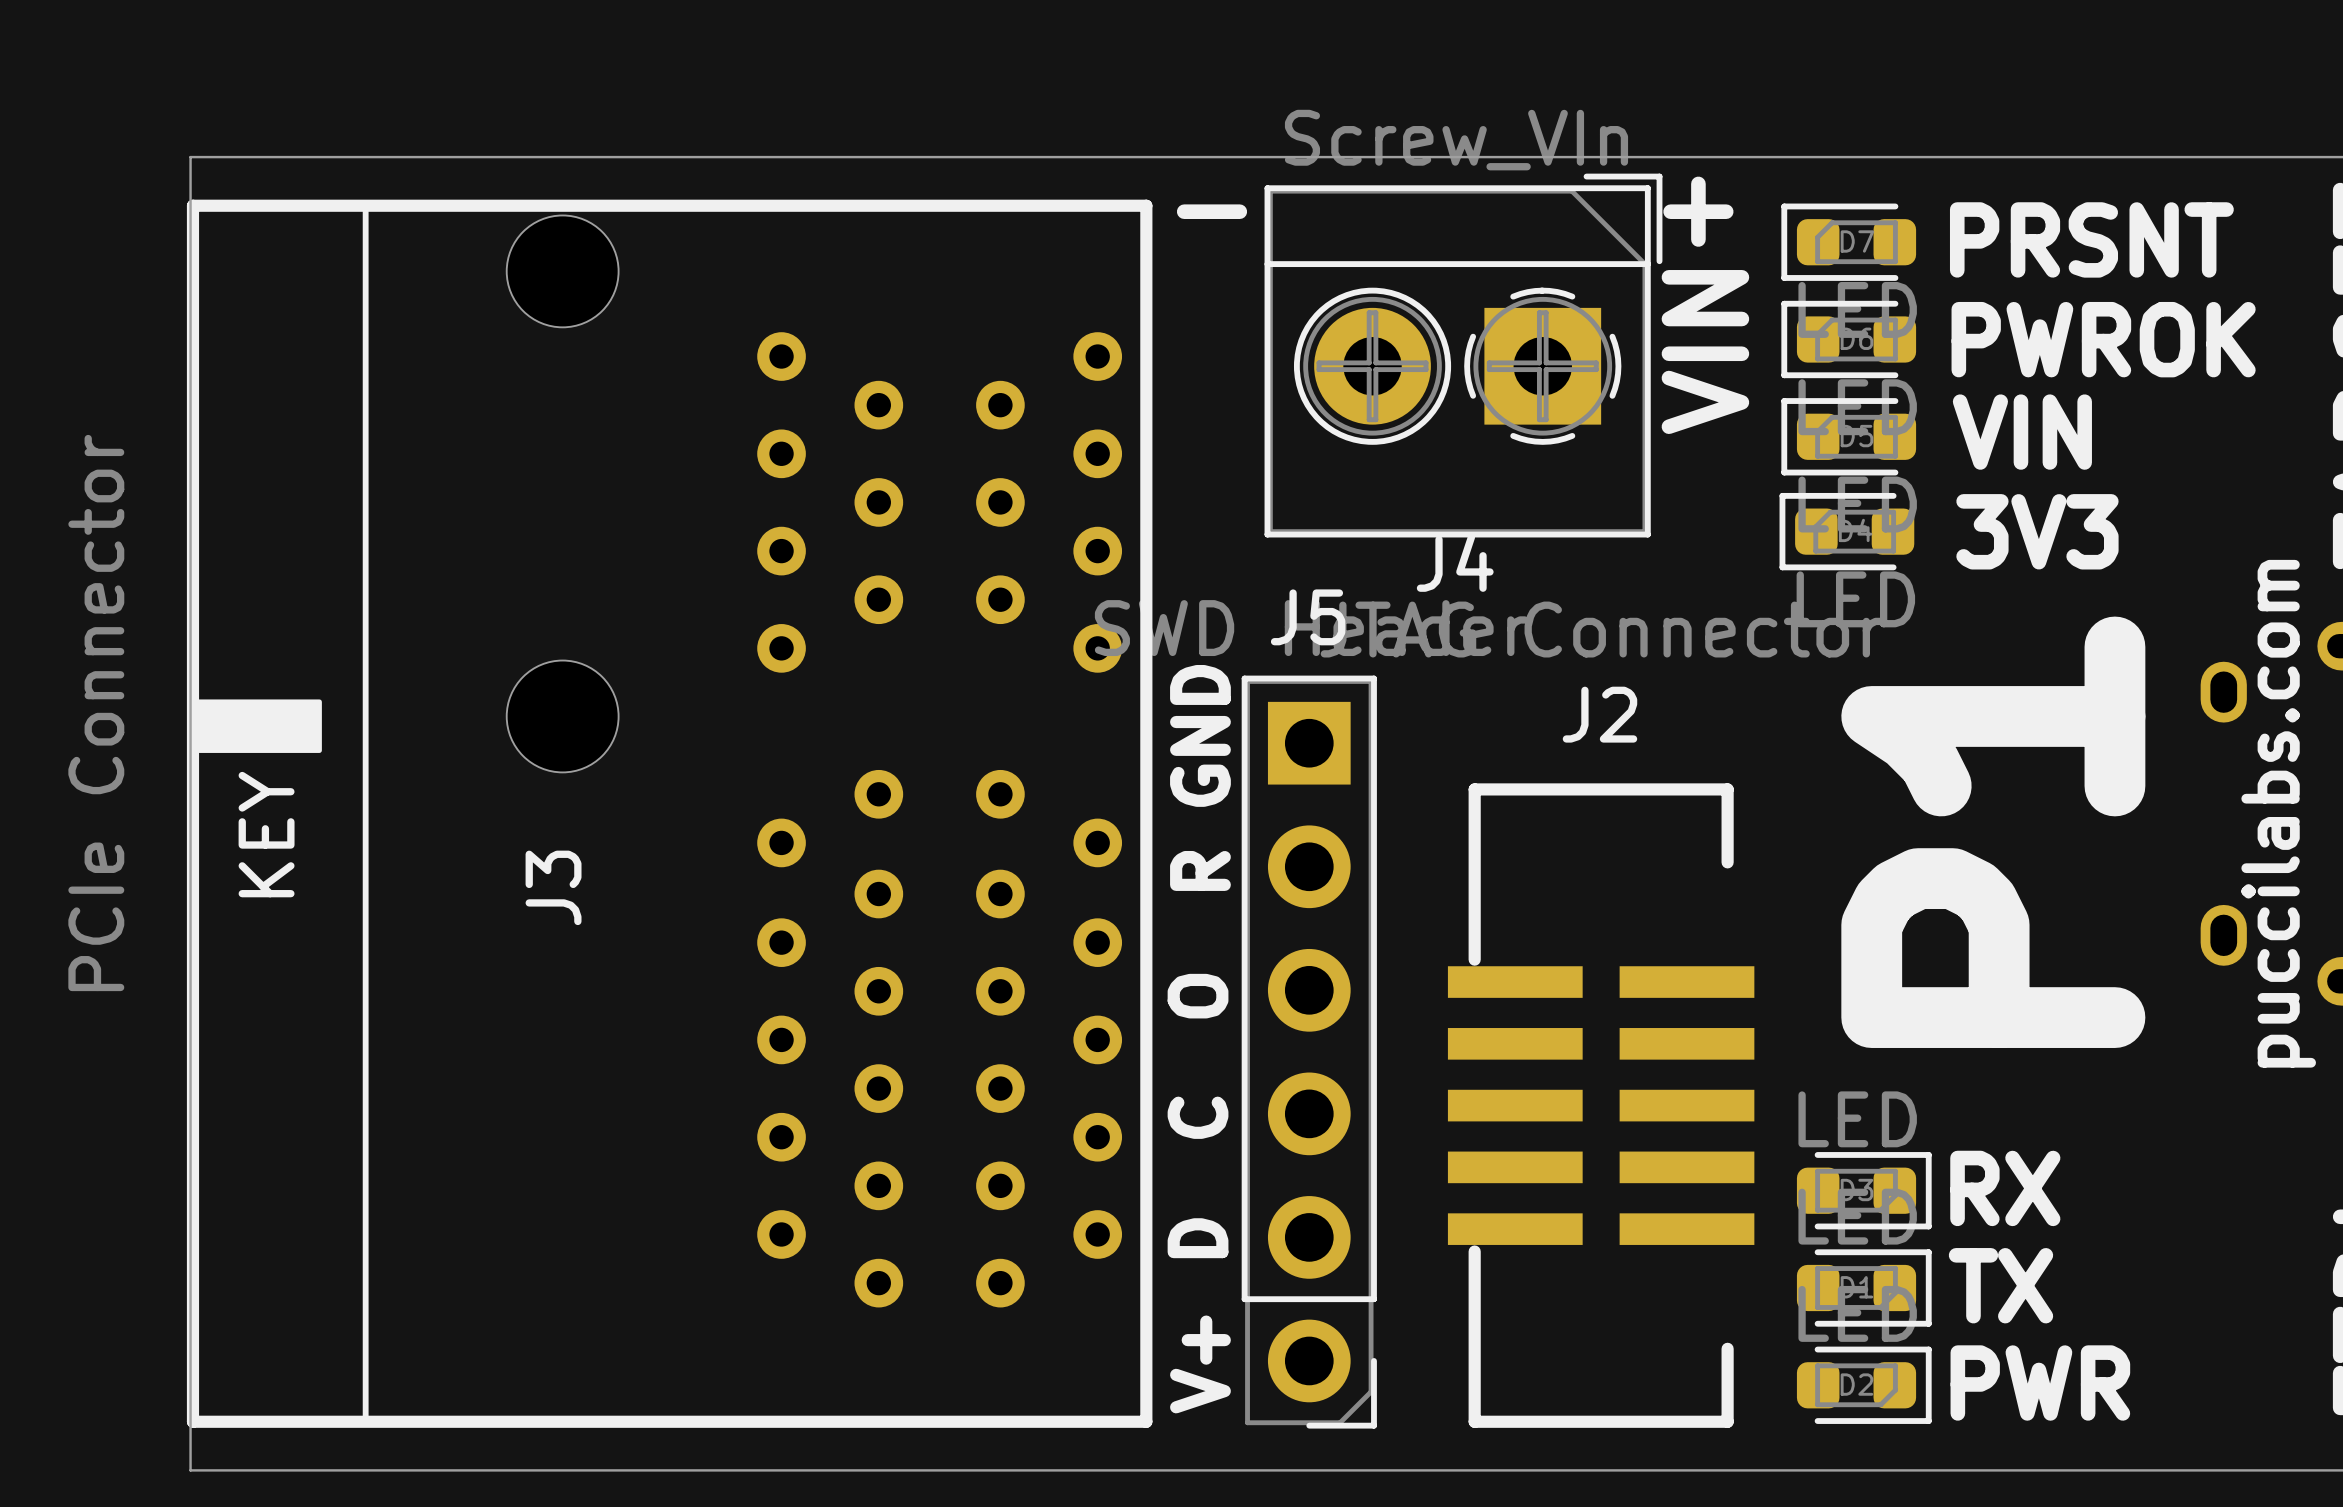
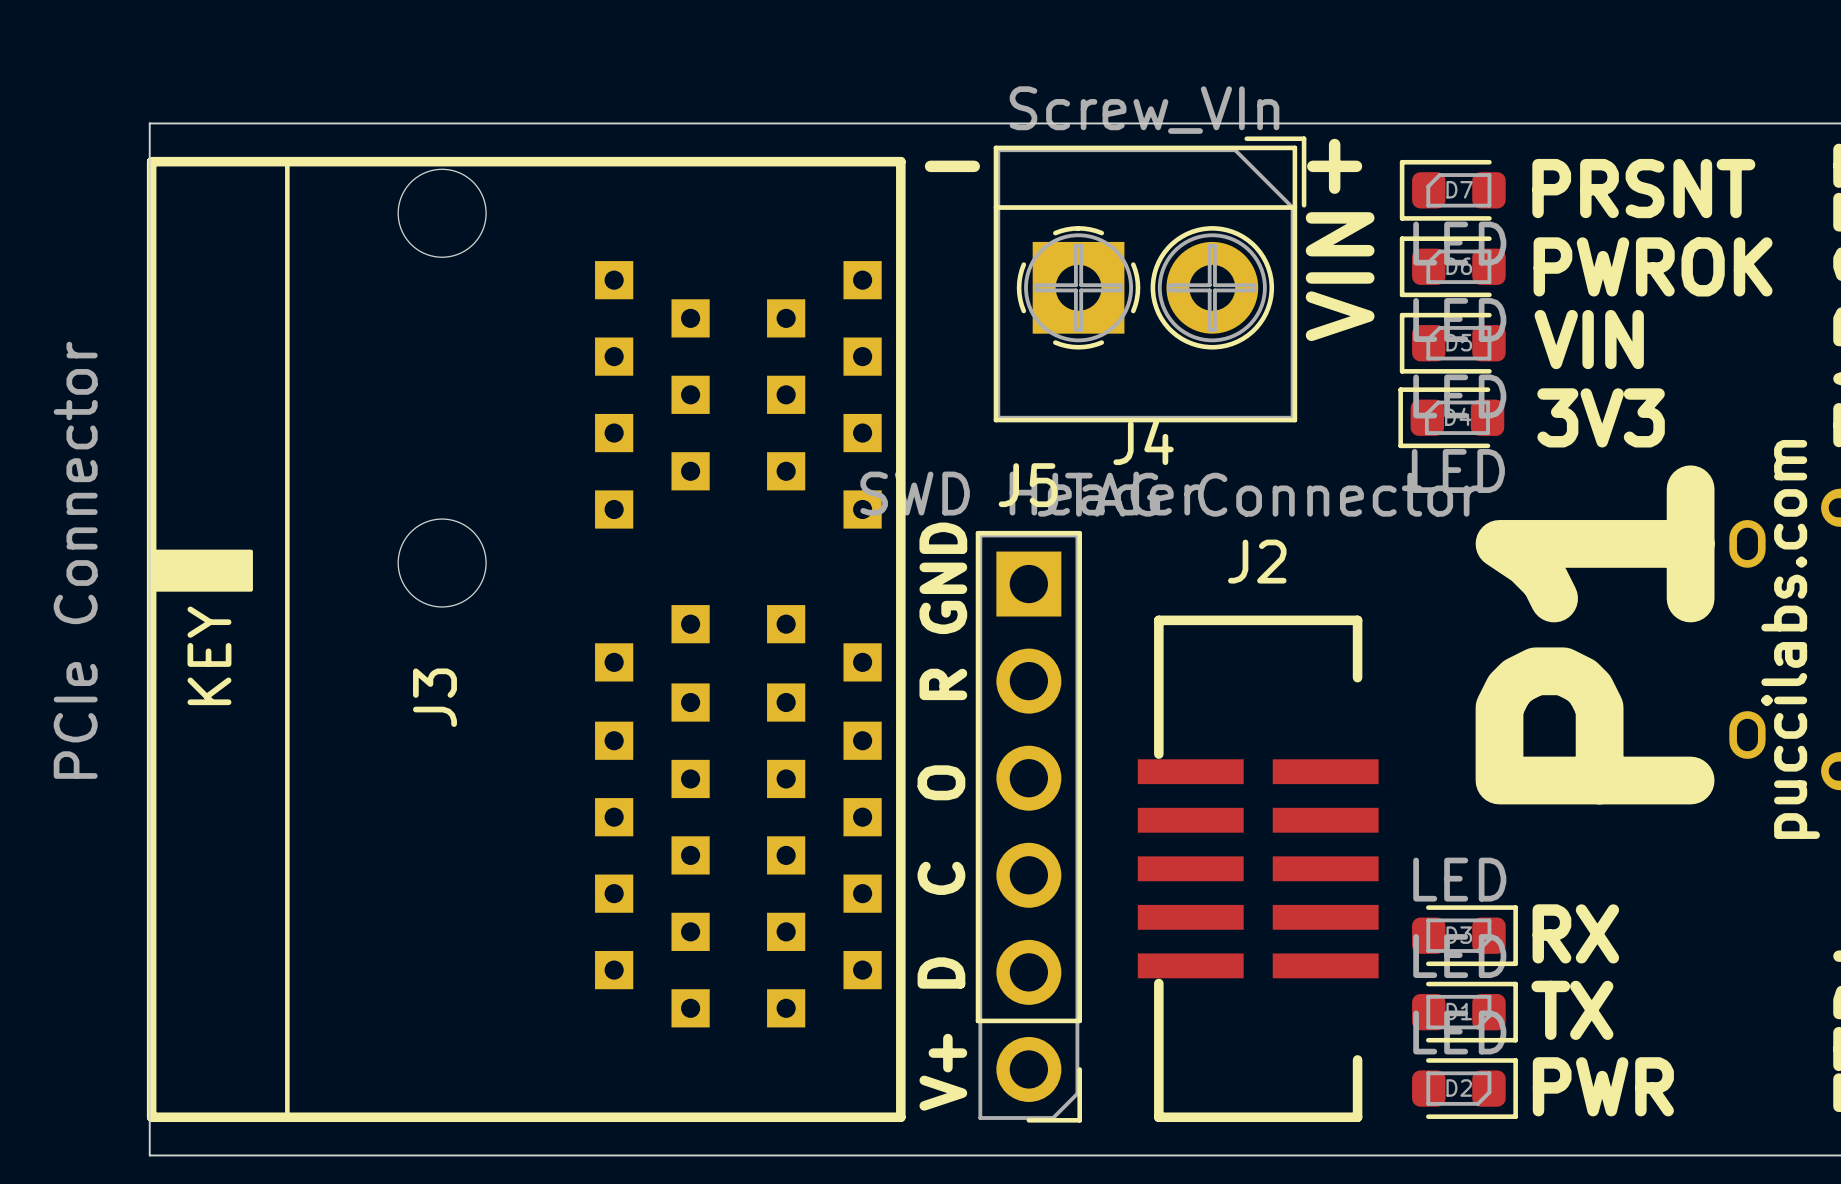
J4 footprint: [1264, 173, 1663, 538] -> [993, 136, 1307, 423]
J3 footprint: [186, 199, 1153, 1428] -> [146, 156, 906, 1123]
text position: P1 (1993, 832) -> P1 (1595, 634)

